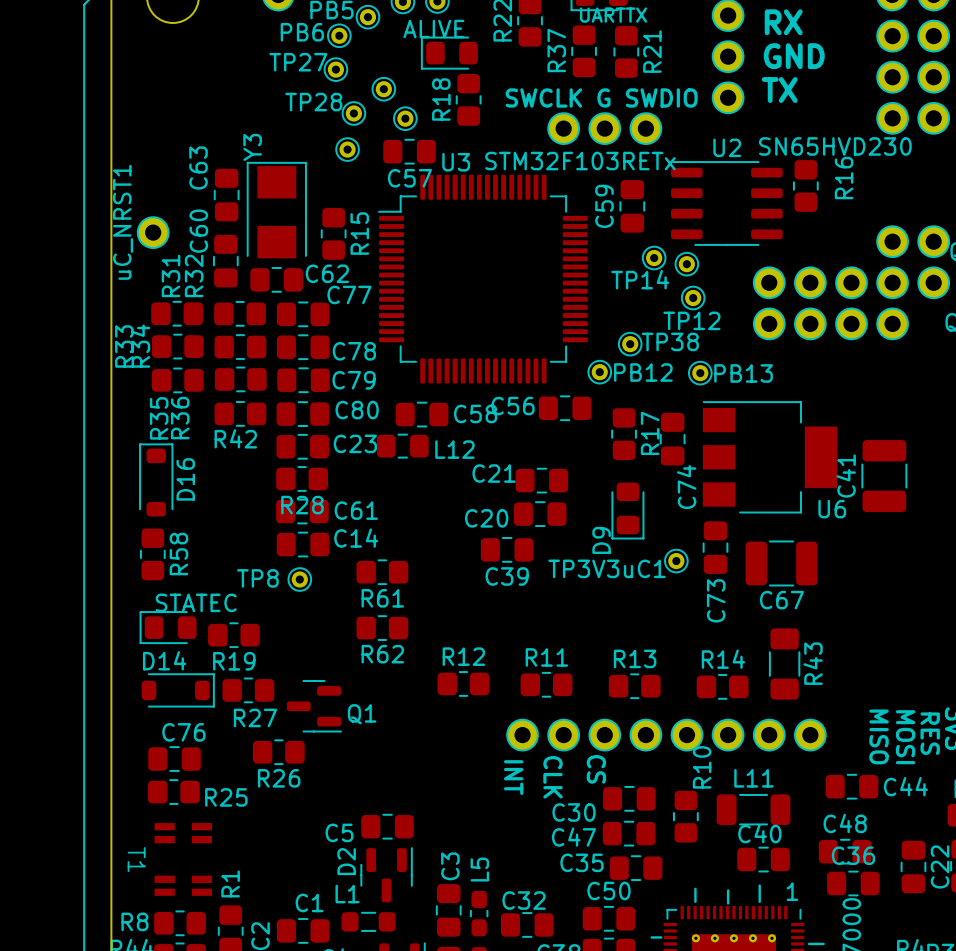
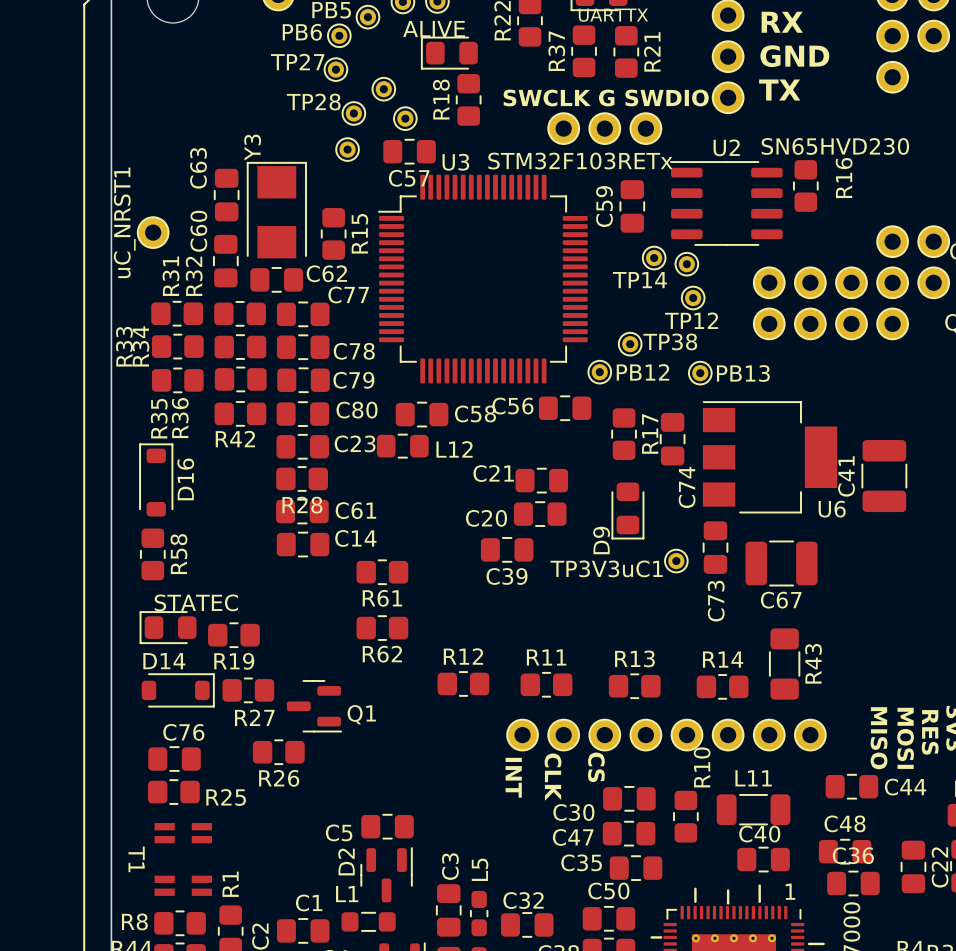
part: (933, 77) -> none
part: (892, 118) -> none
part: (933, 118) -> none
TP8: (299, 579) -> none

